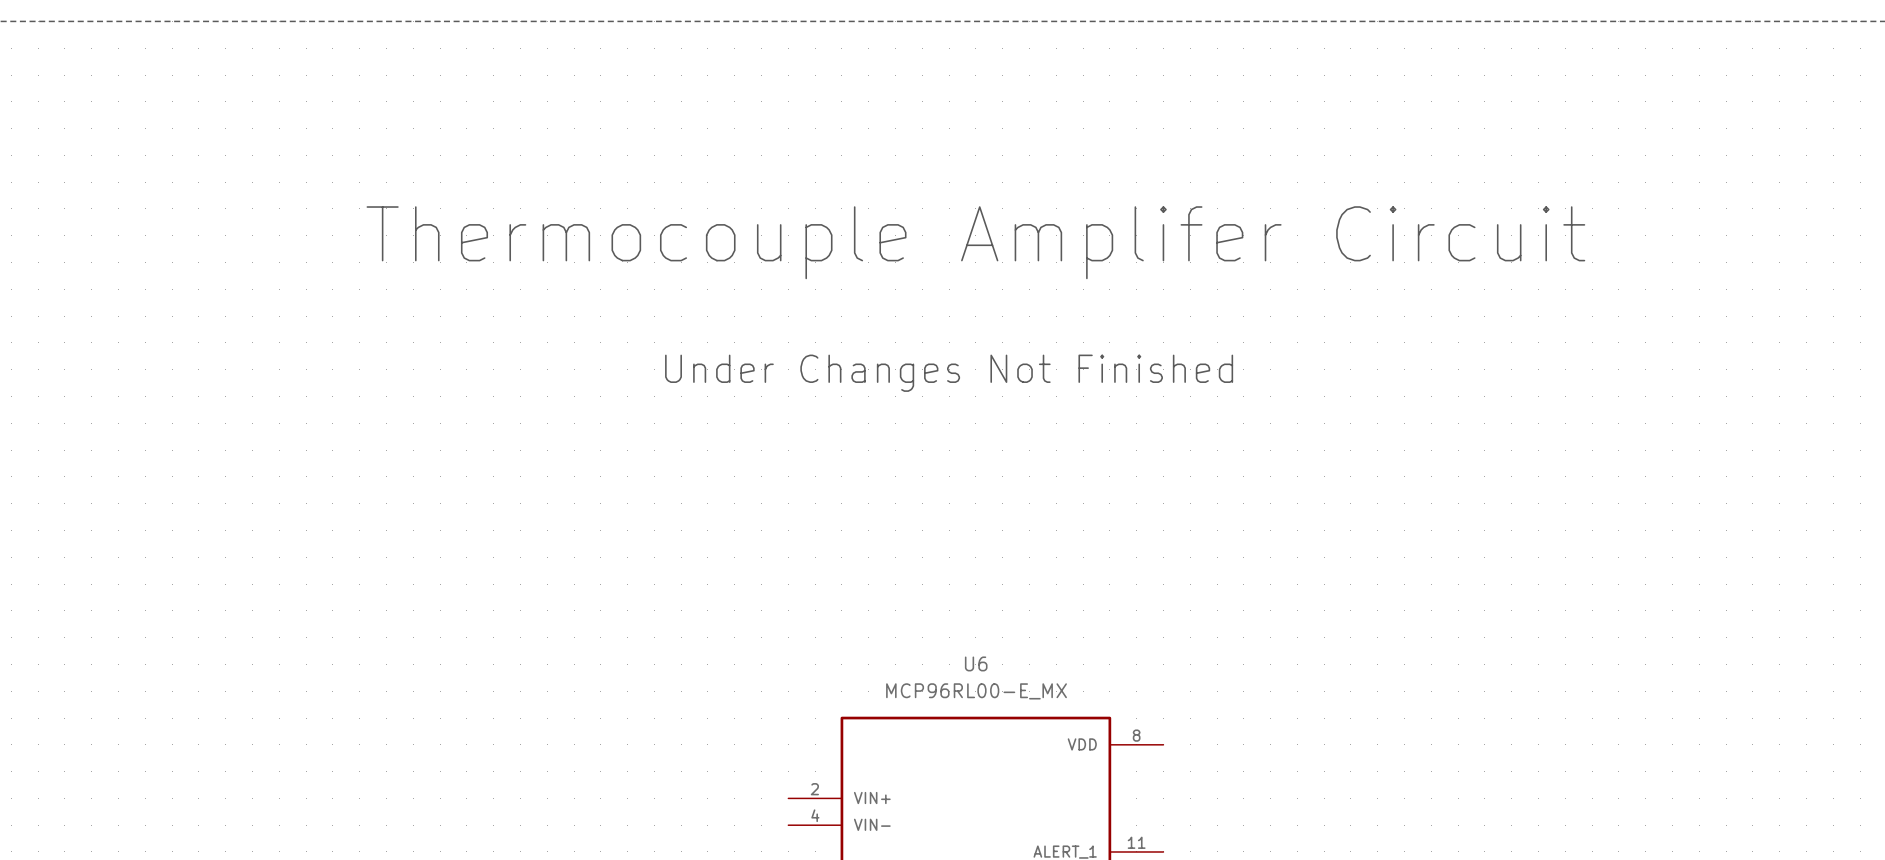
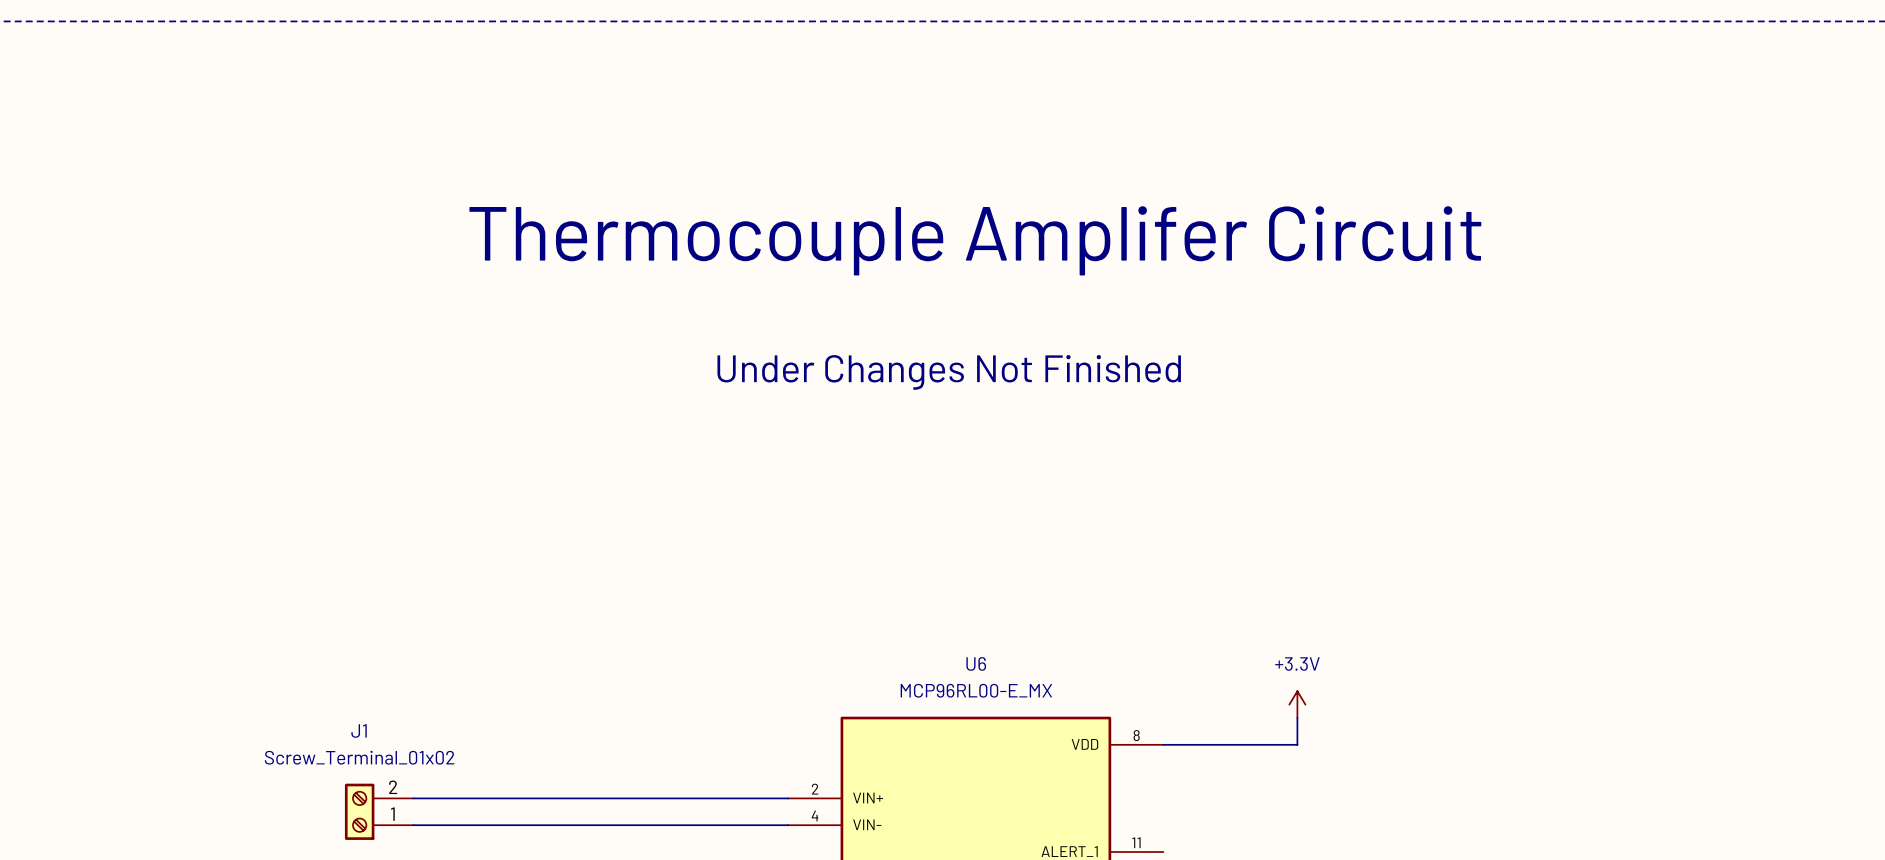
power symbol: none -> +3.3V (1297, 704)
wire: none -> (1297, 718) (1297, 744) (1163, 744)
wire: none -> (413, 798) (788, 798)
J1: none -> Screw_Terminal_01x02 (379, 811)
wire: none -> (413, 825) (788, 825)

